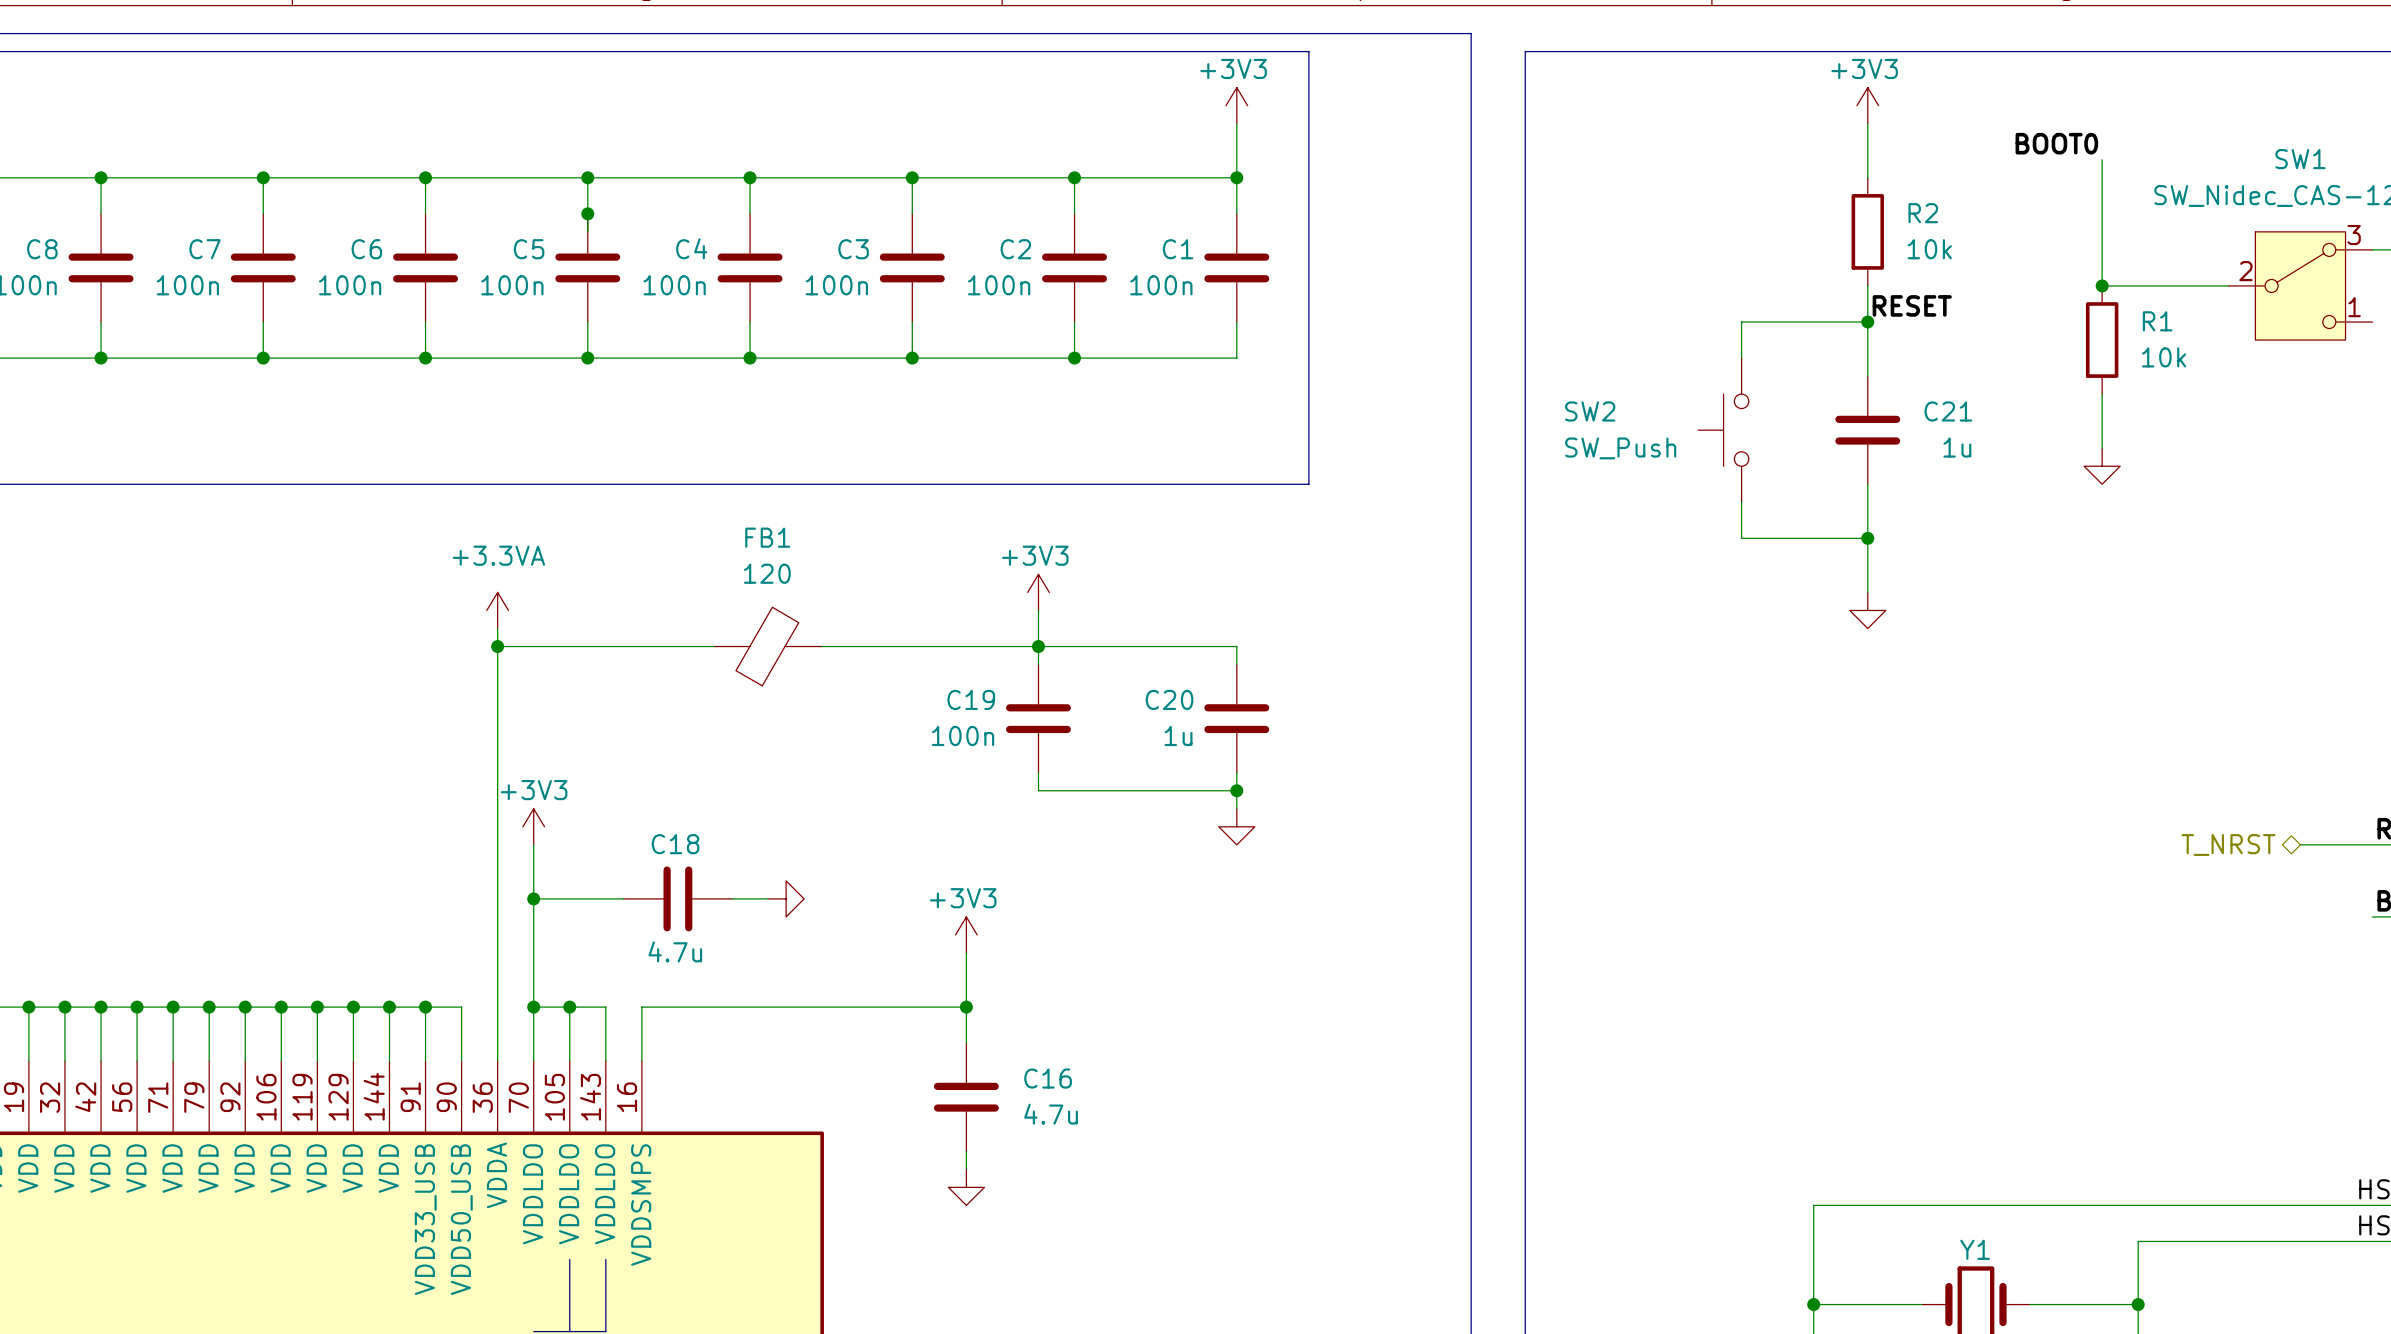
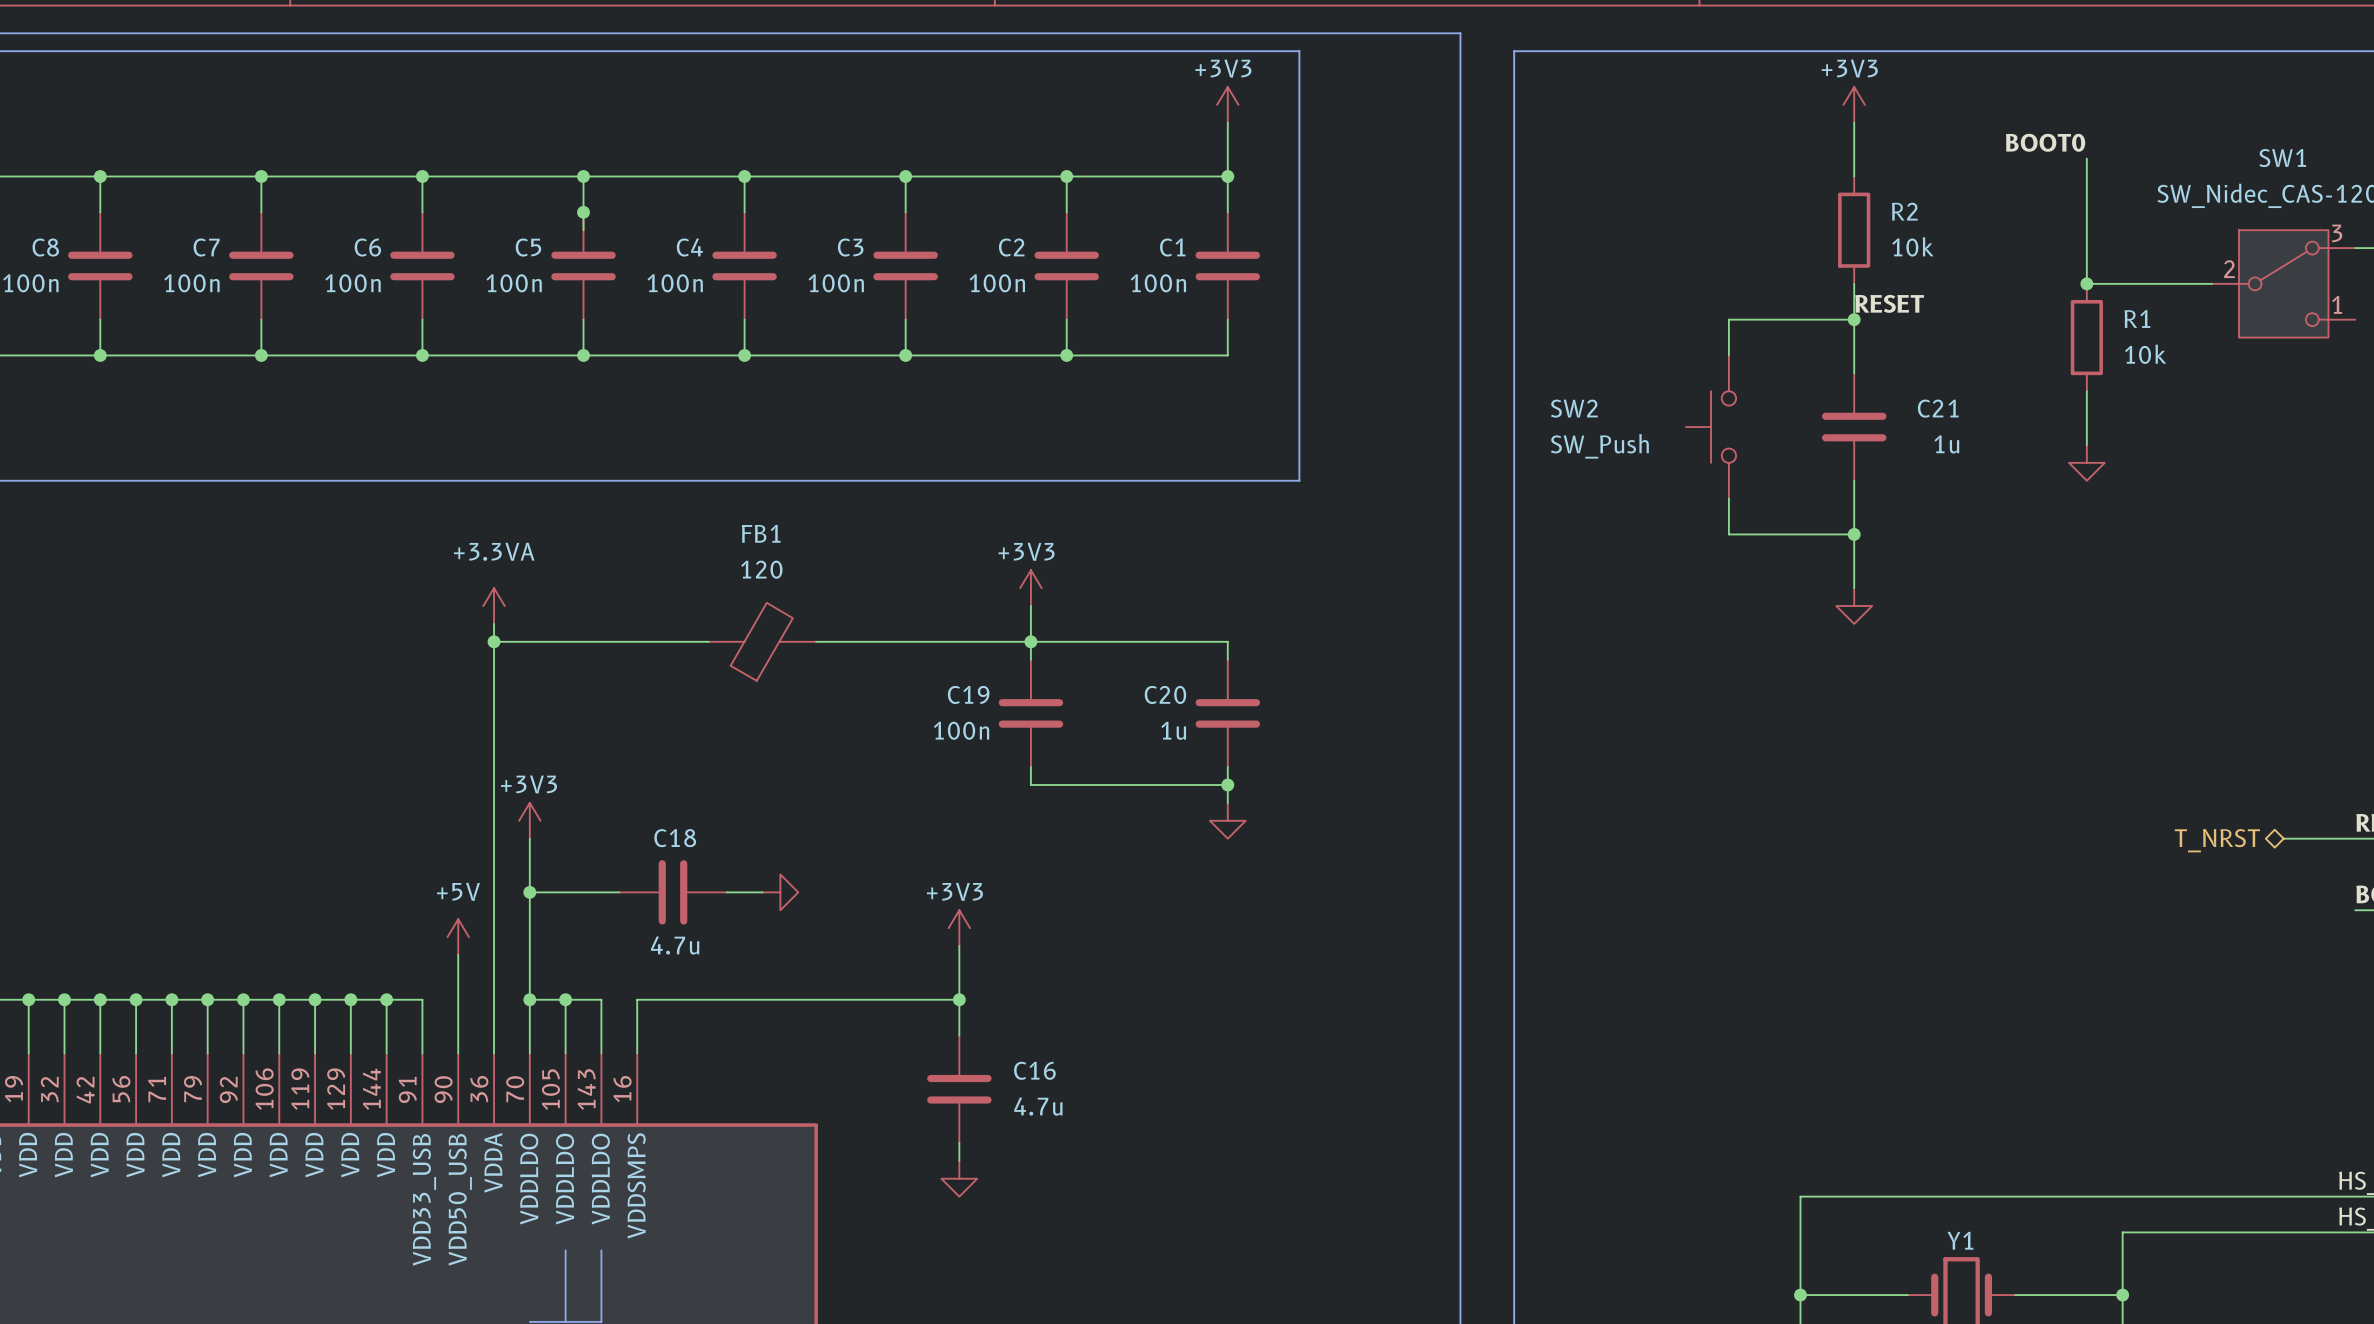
power symbol: none -> +5V (458, 937)
wire: (425, 1007) (461, 1007) -> (458, 955) (458, 999)
junction: (425, 1007) -> none

